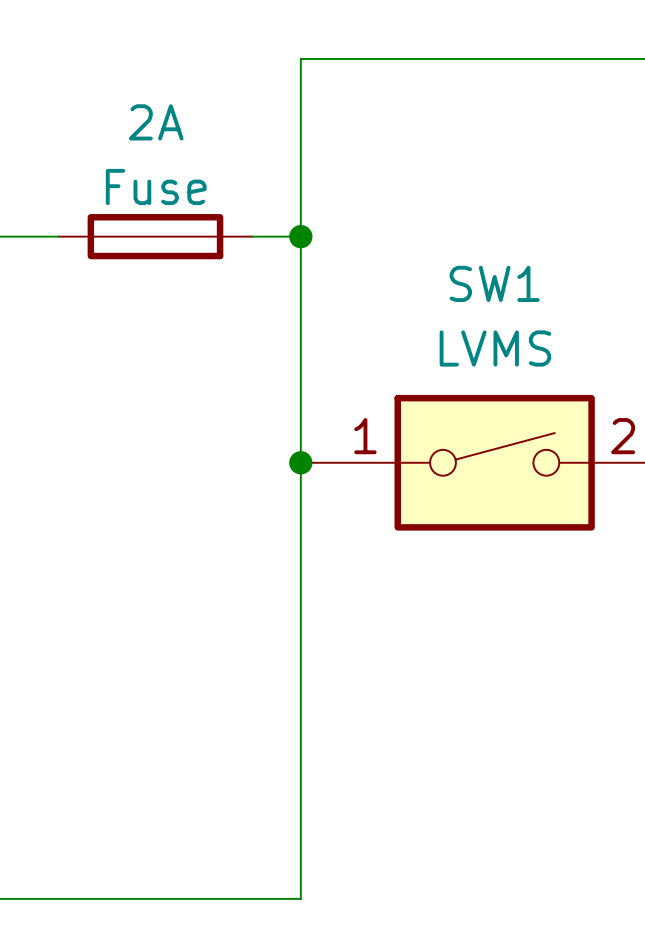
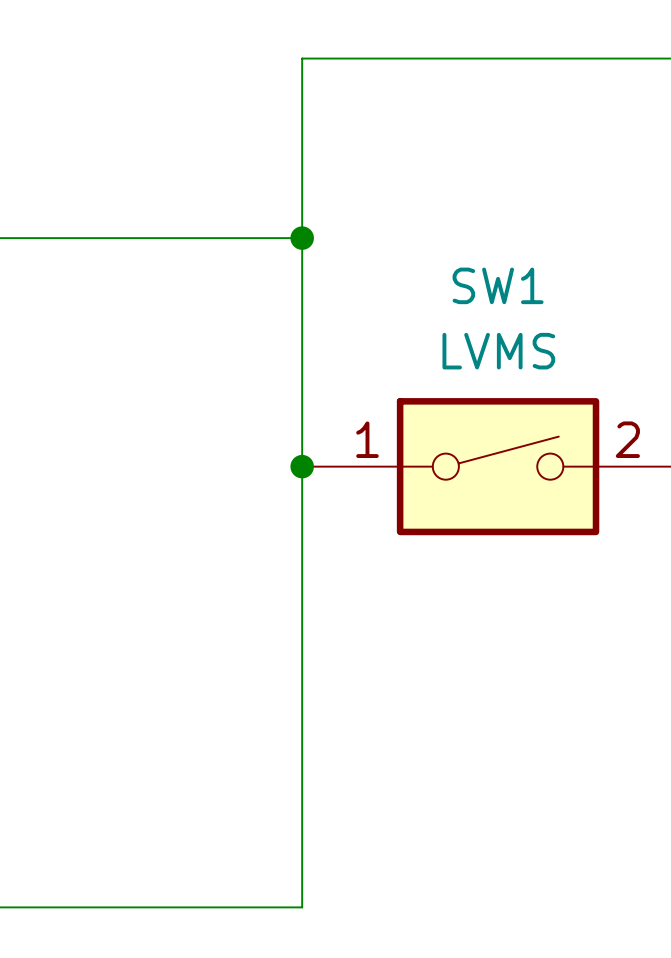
2A: Fuse (155, 236) -> none

